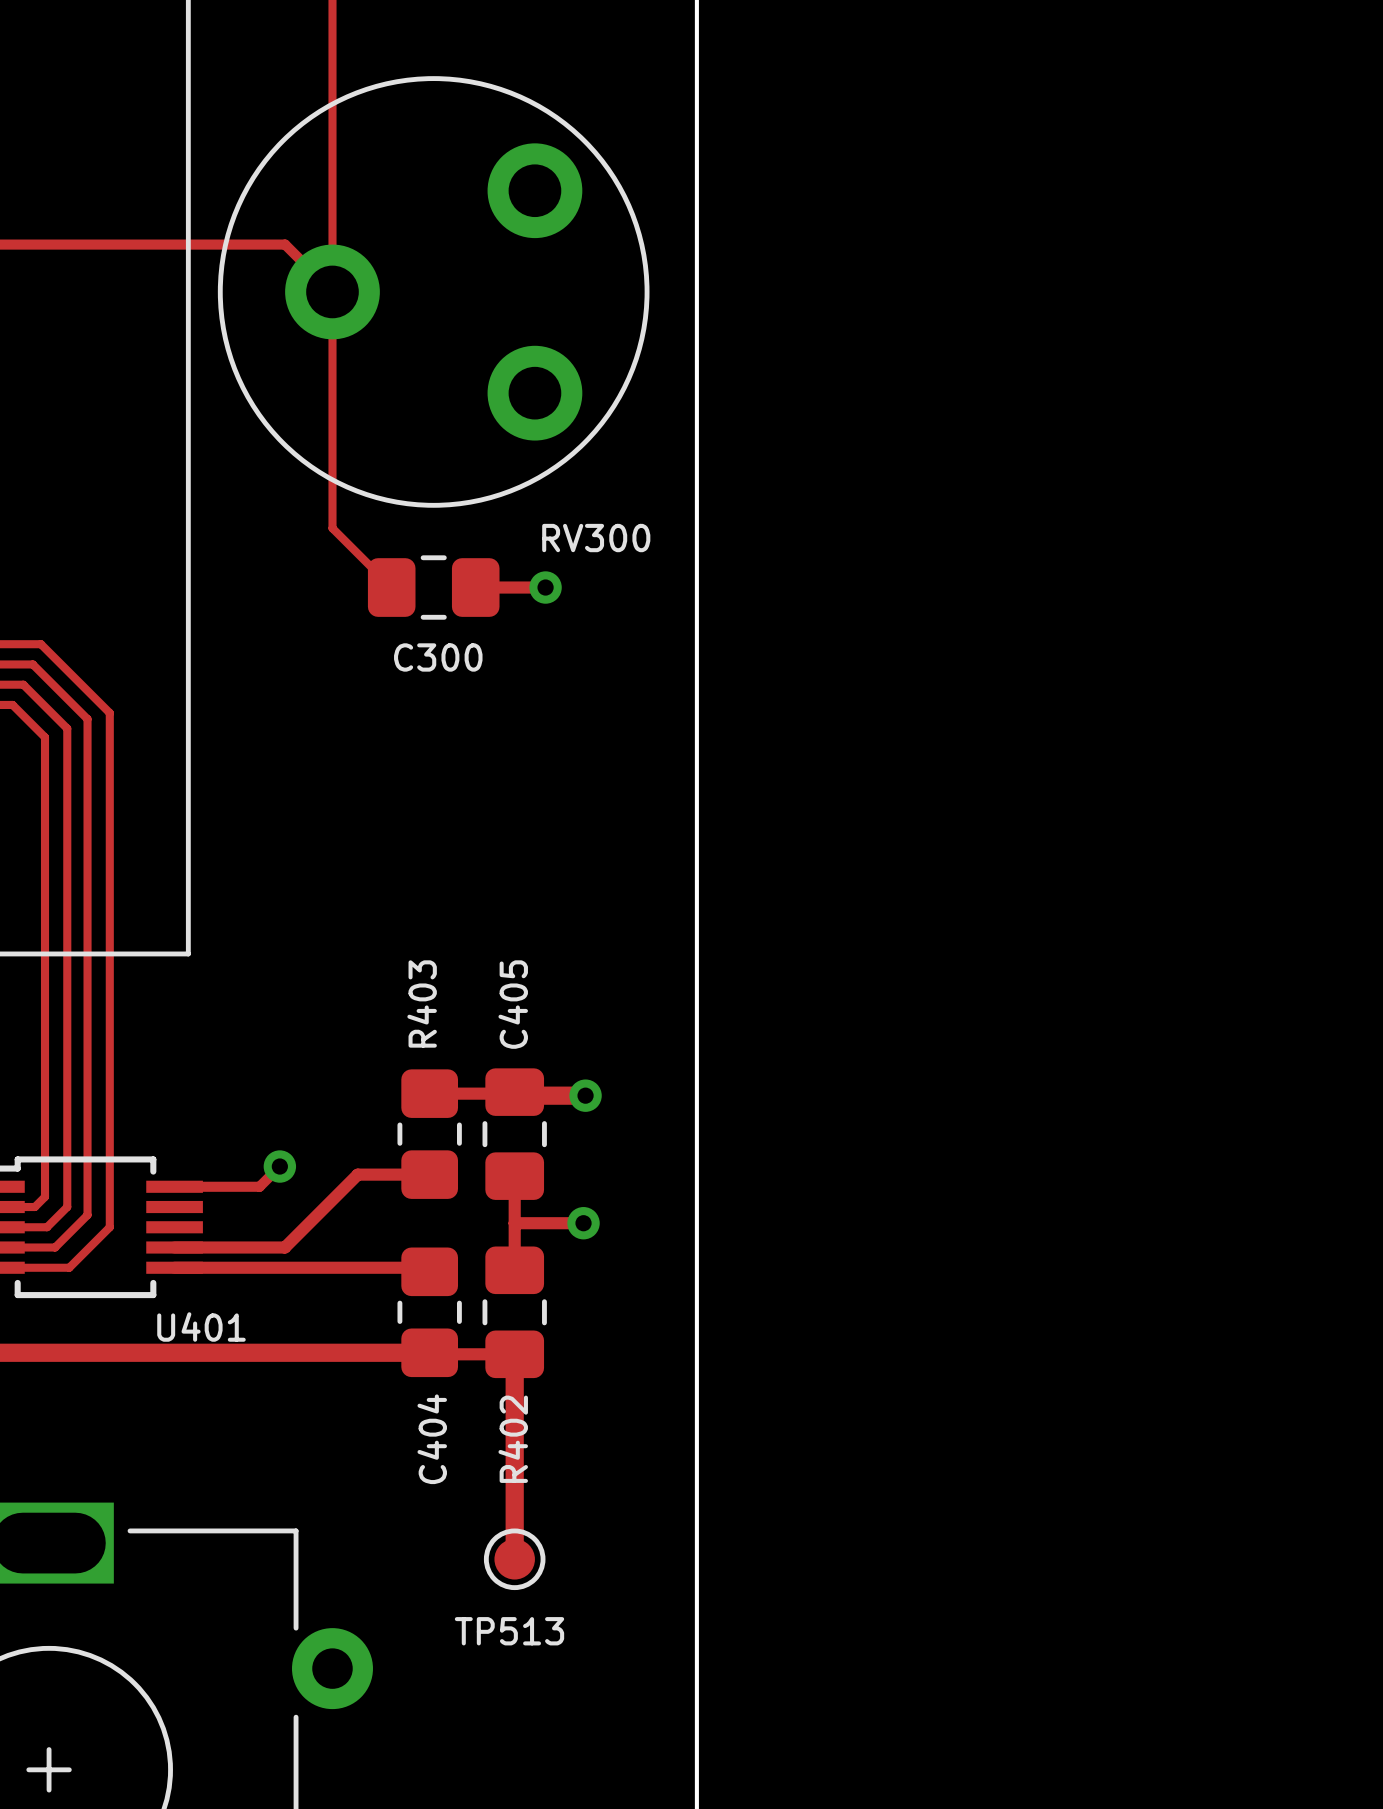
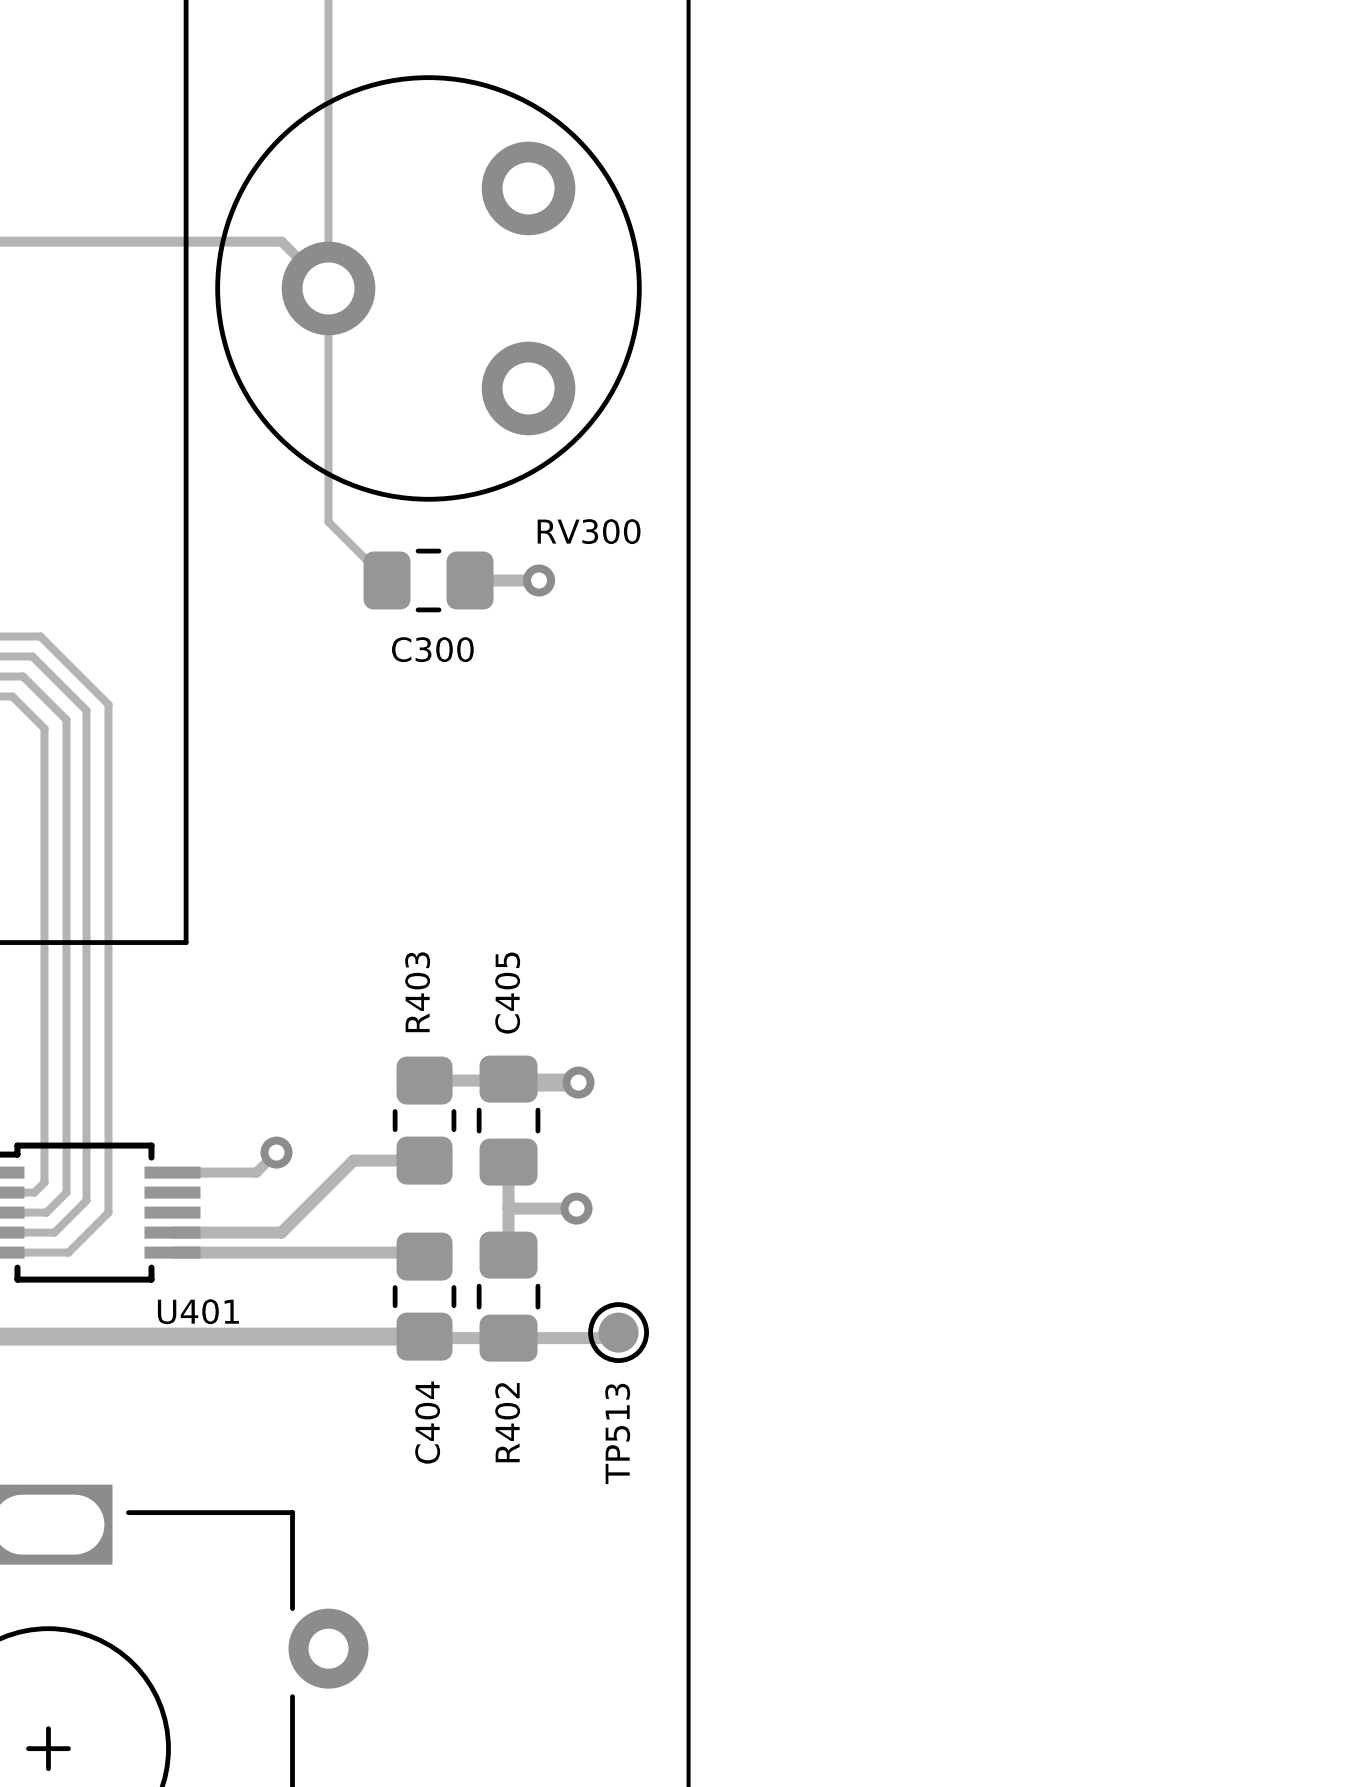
track: (514, 1354) (514, 1559) -> (508, 1338) (613, 1338)
TP513 position: (514, 1559) -> (618, 1332)
TP513 name rotation: 0° (509, 1631) -> 90° counterclockwise (617, 1433)

